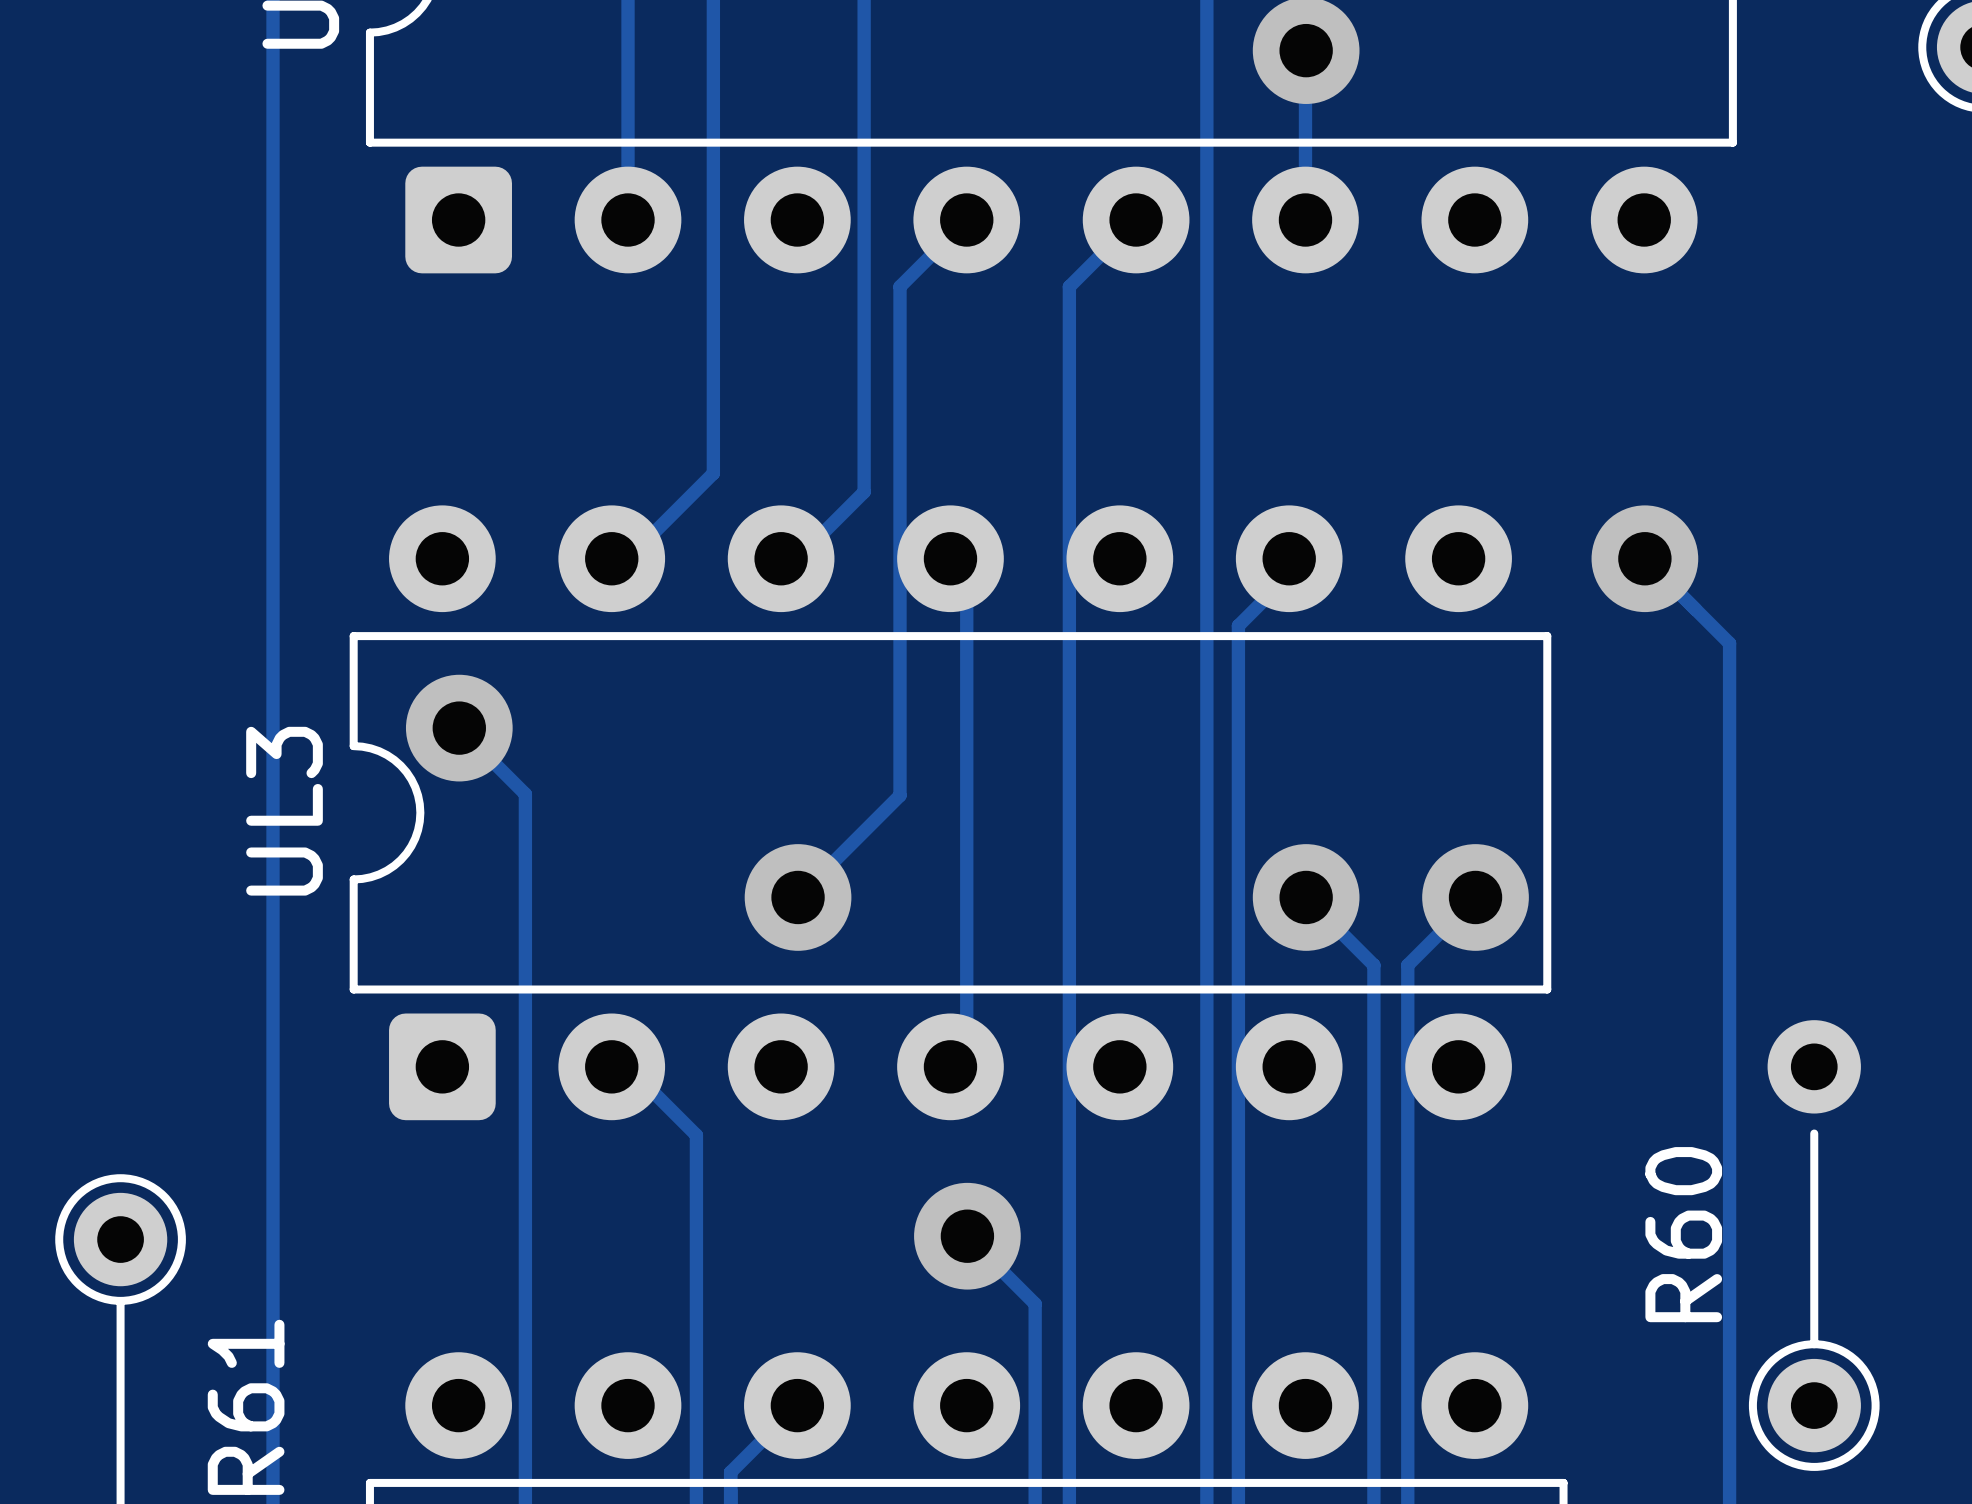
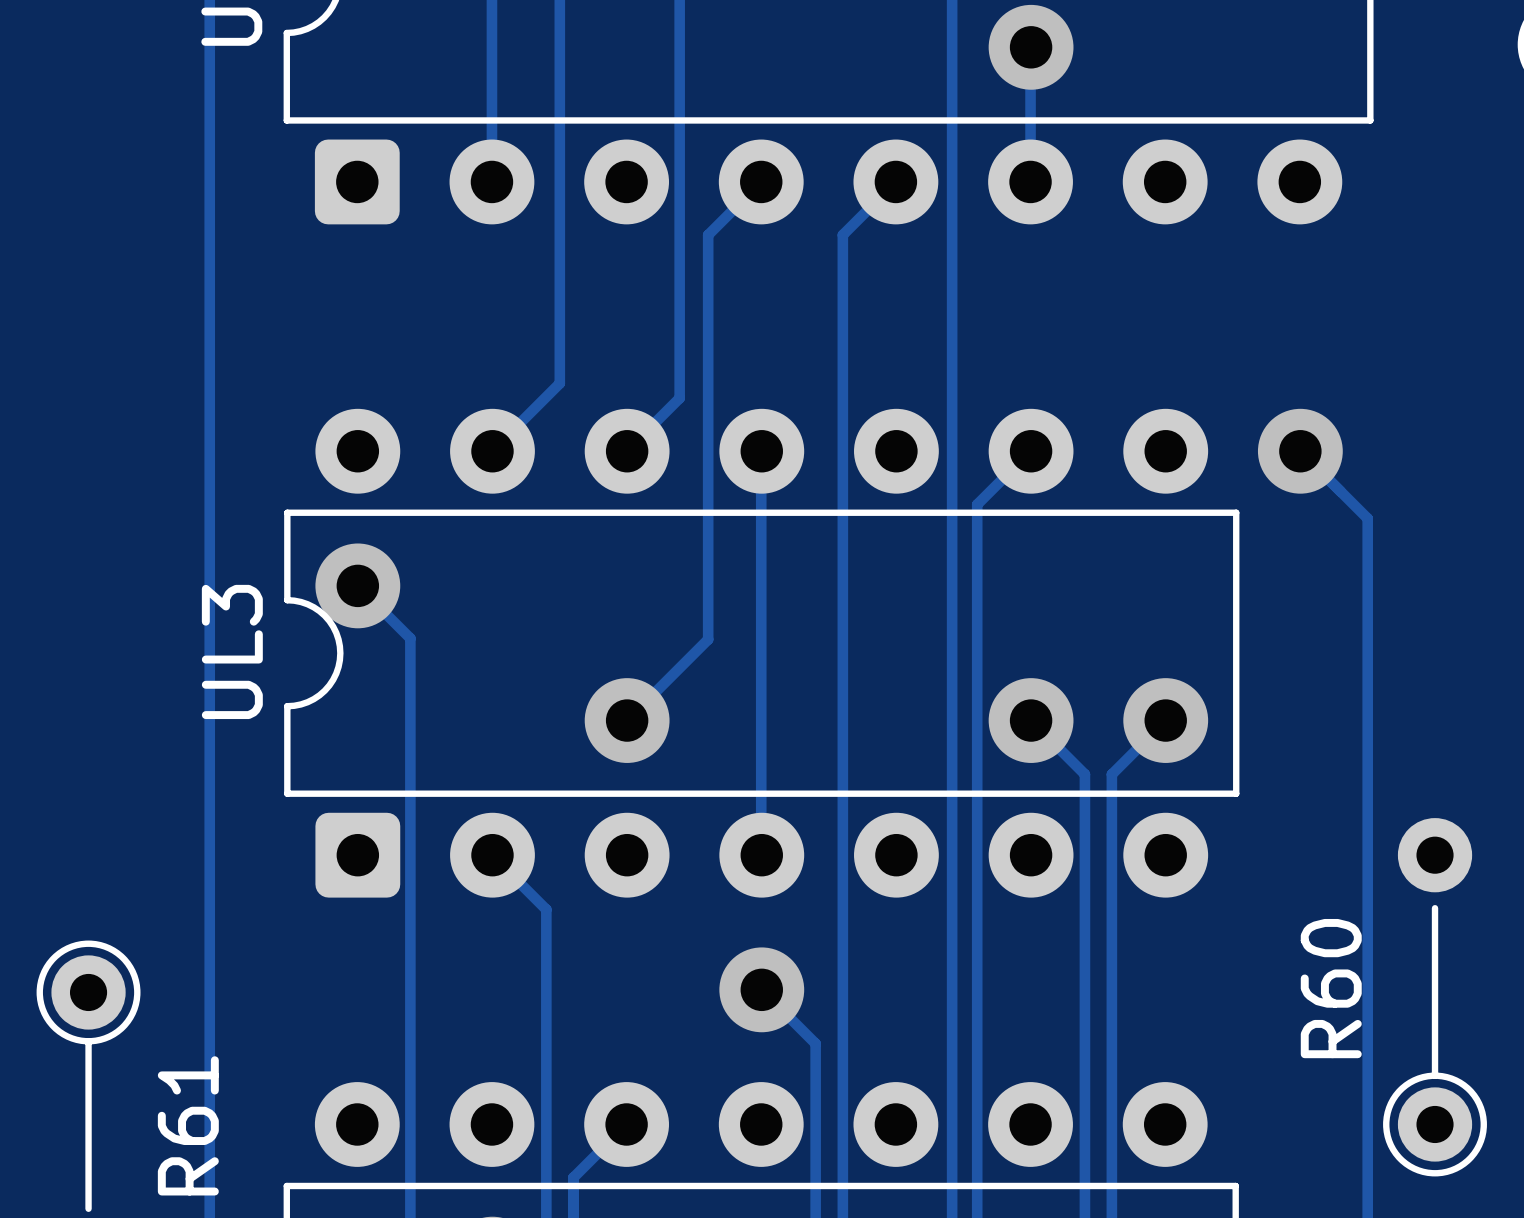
UL3 position: (950, 812) -> (761, 653)

